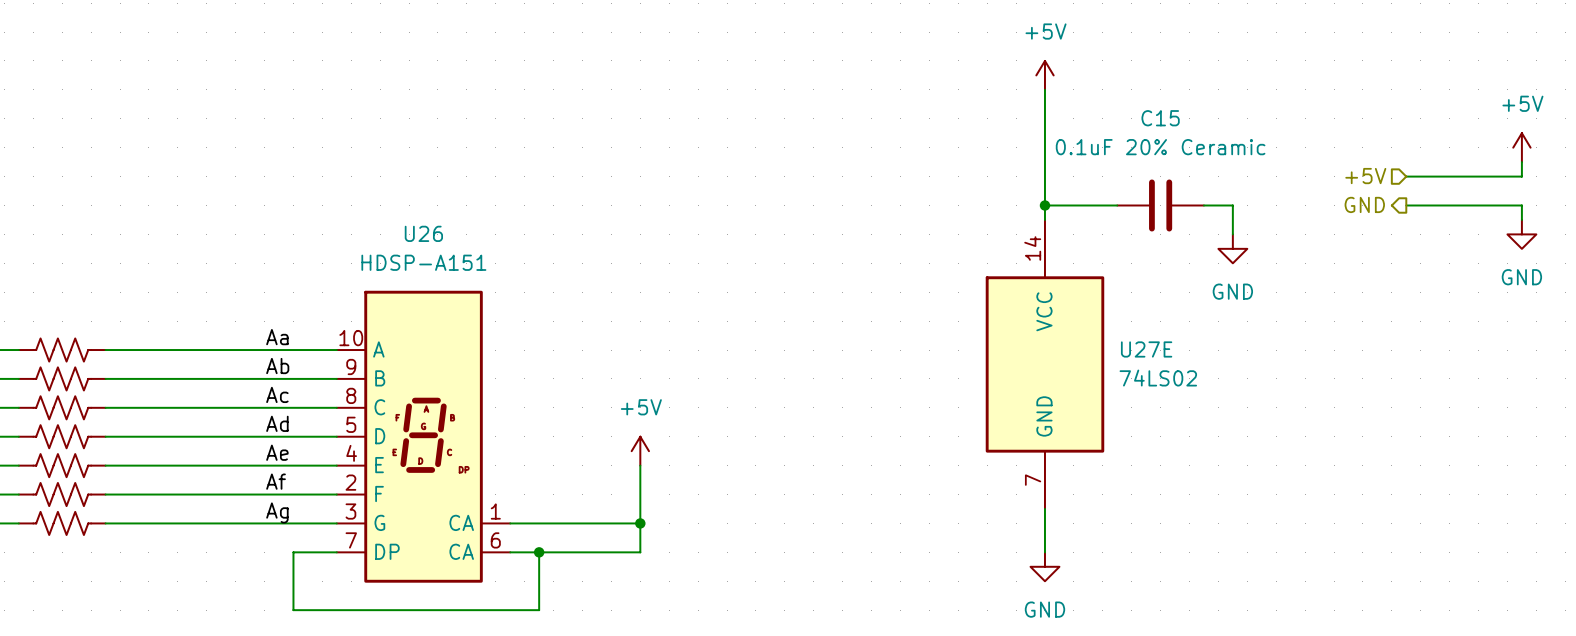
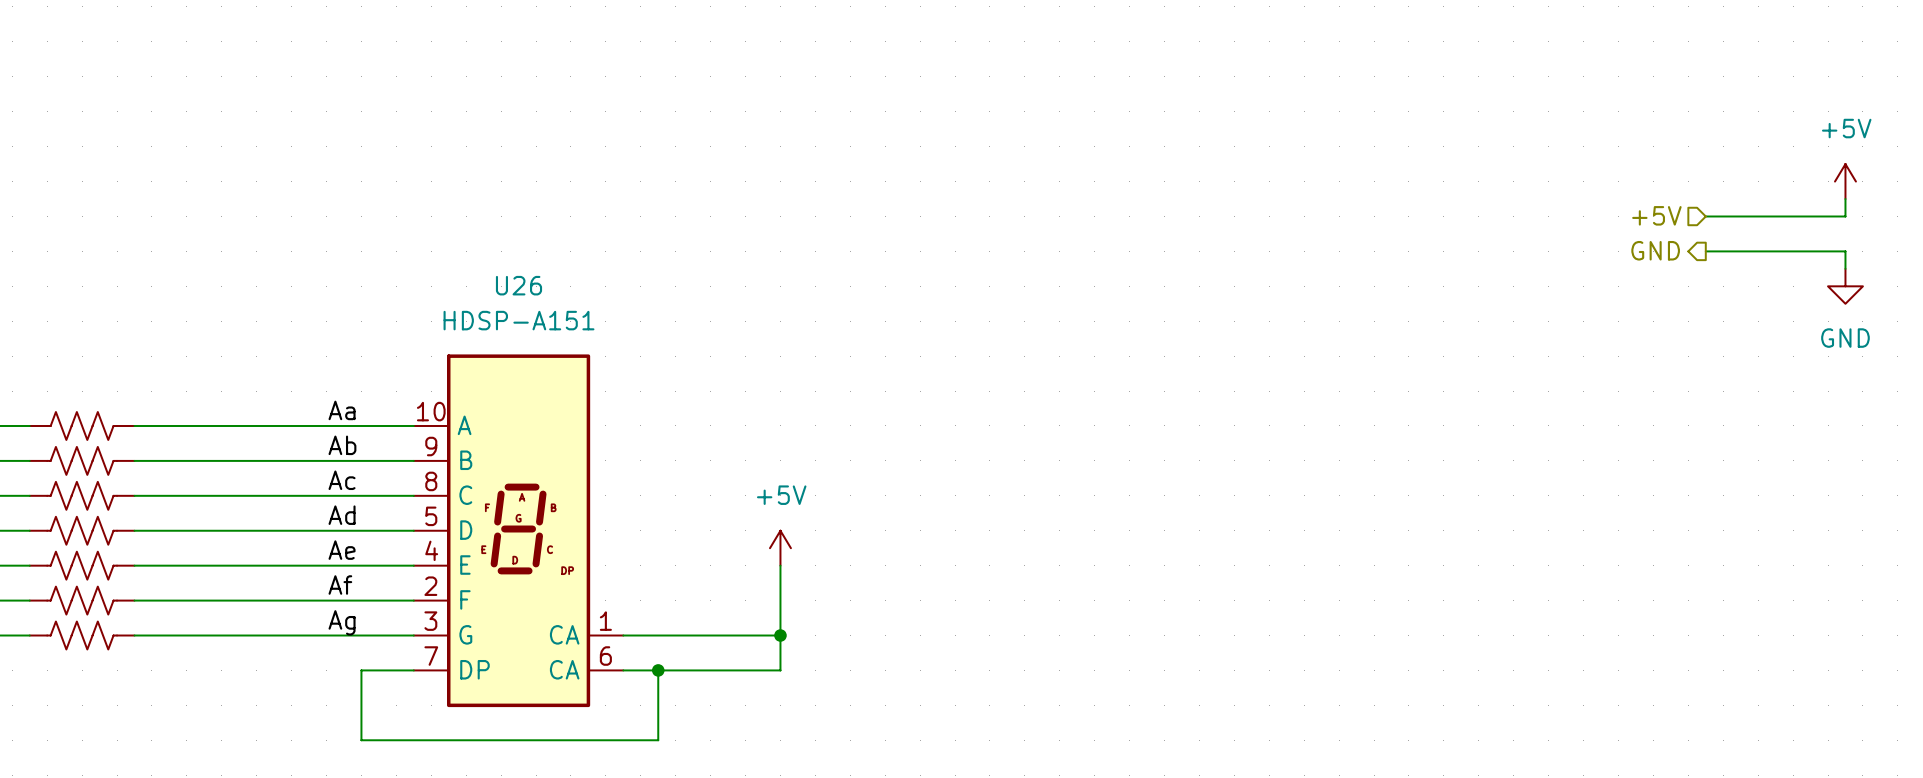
power symbol: +5V (1044, 75) -> none
wire: (1044, 89) (1044, 219) -> none
wire: (1044, 205) (1117, 205) -> none
junction: (1044, 205) -> none
C15: 0.1uF 20% Ceramic (1160, 205) -> none
wire: (1203, 205) (1232, 205) (1232, 234) -> none
power symbol: GND (1232, 248) -> none
U27E: 74LS02 (1044, 364) -> none
wire: (1044, 508) (1044, 552) -> none
power symbol: GND (1044, 566) -> none

